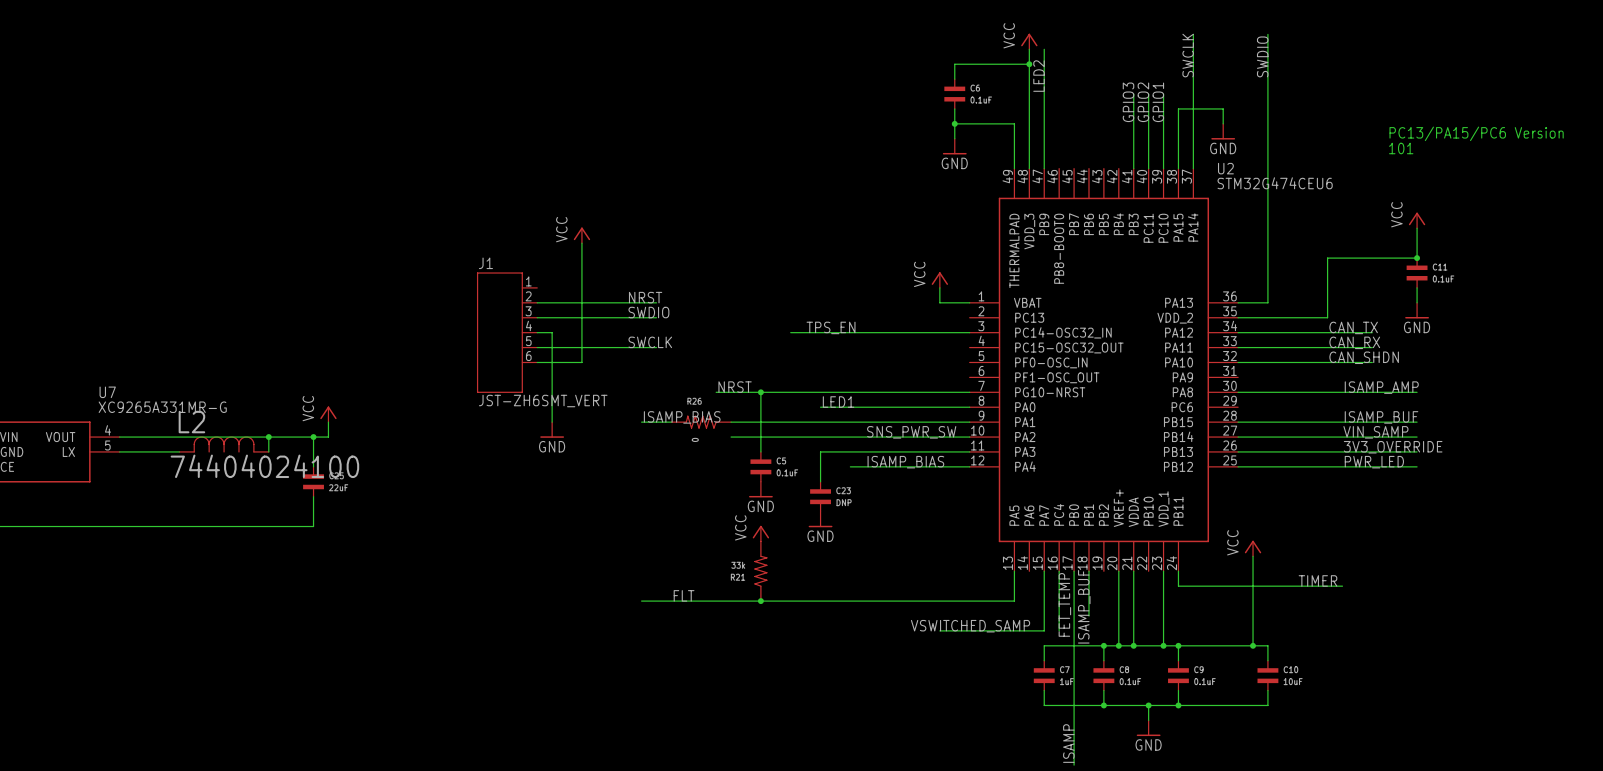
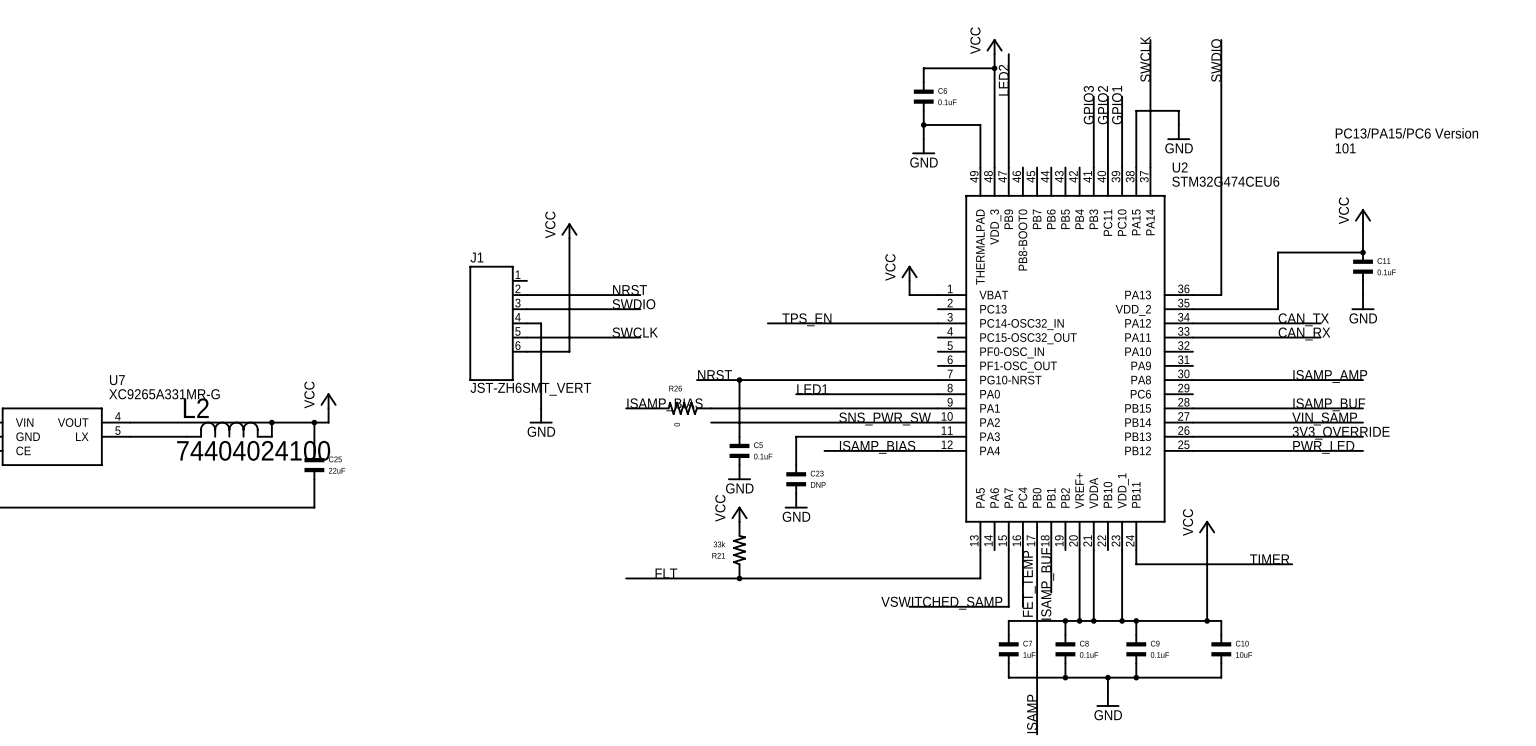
label: CAN_SHDN (1364, 357) -> none
wire: (1238, 362) (1372, 362) -> none

